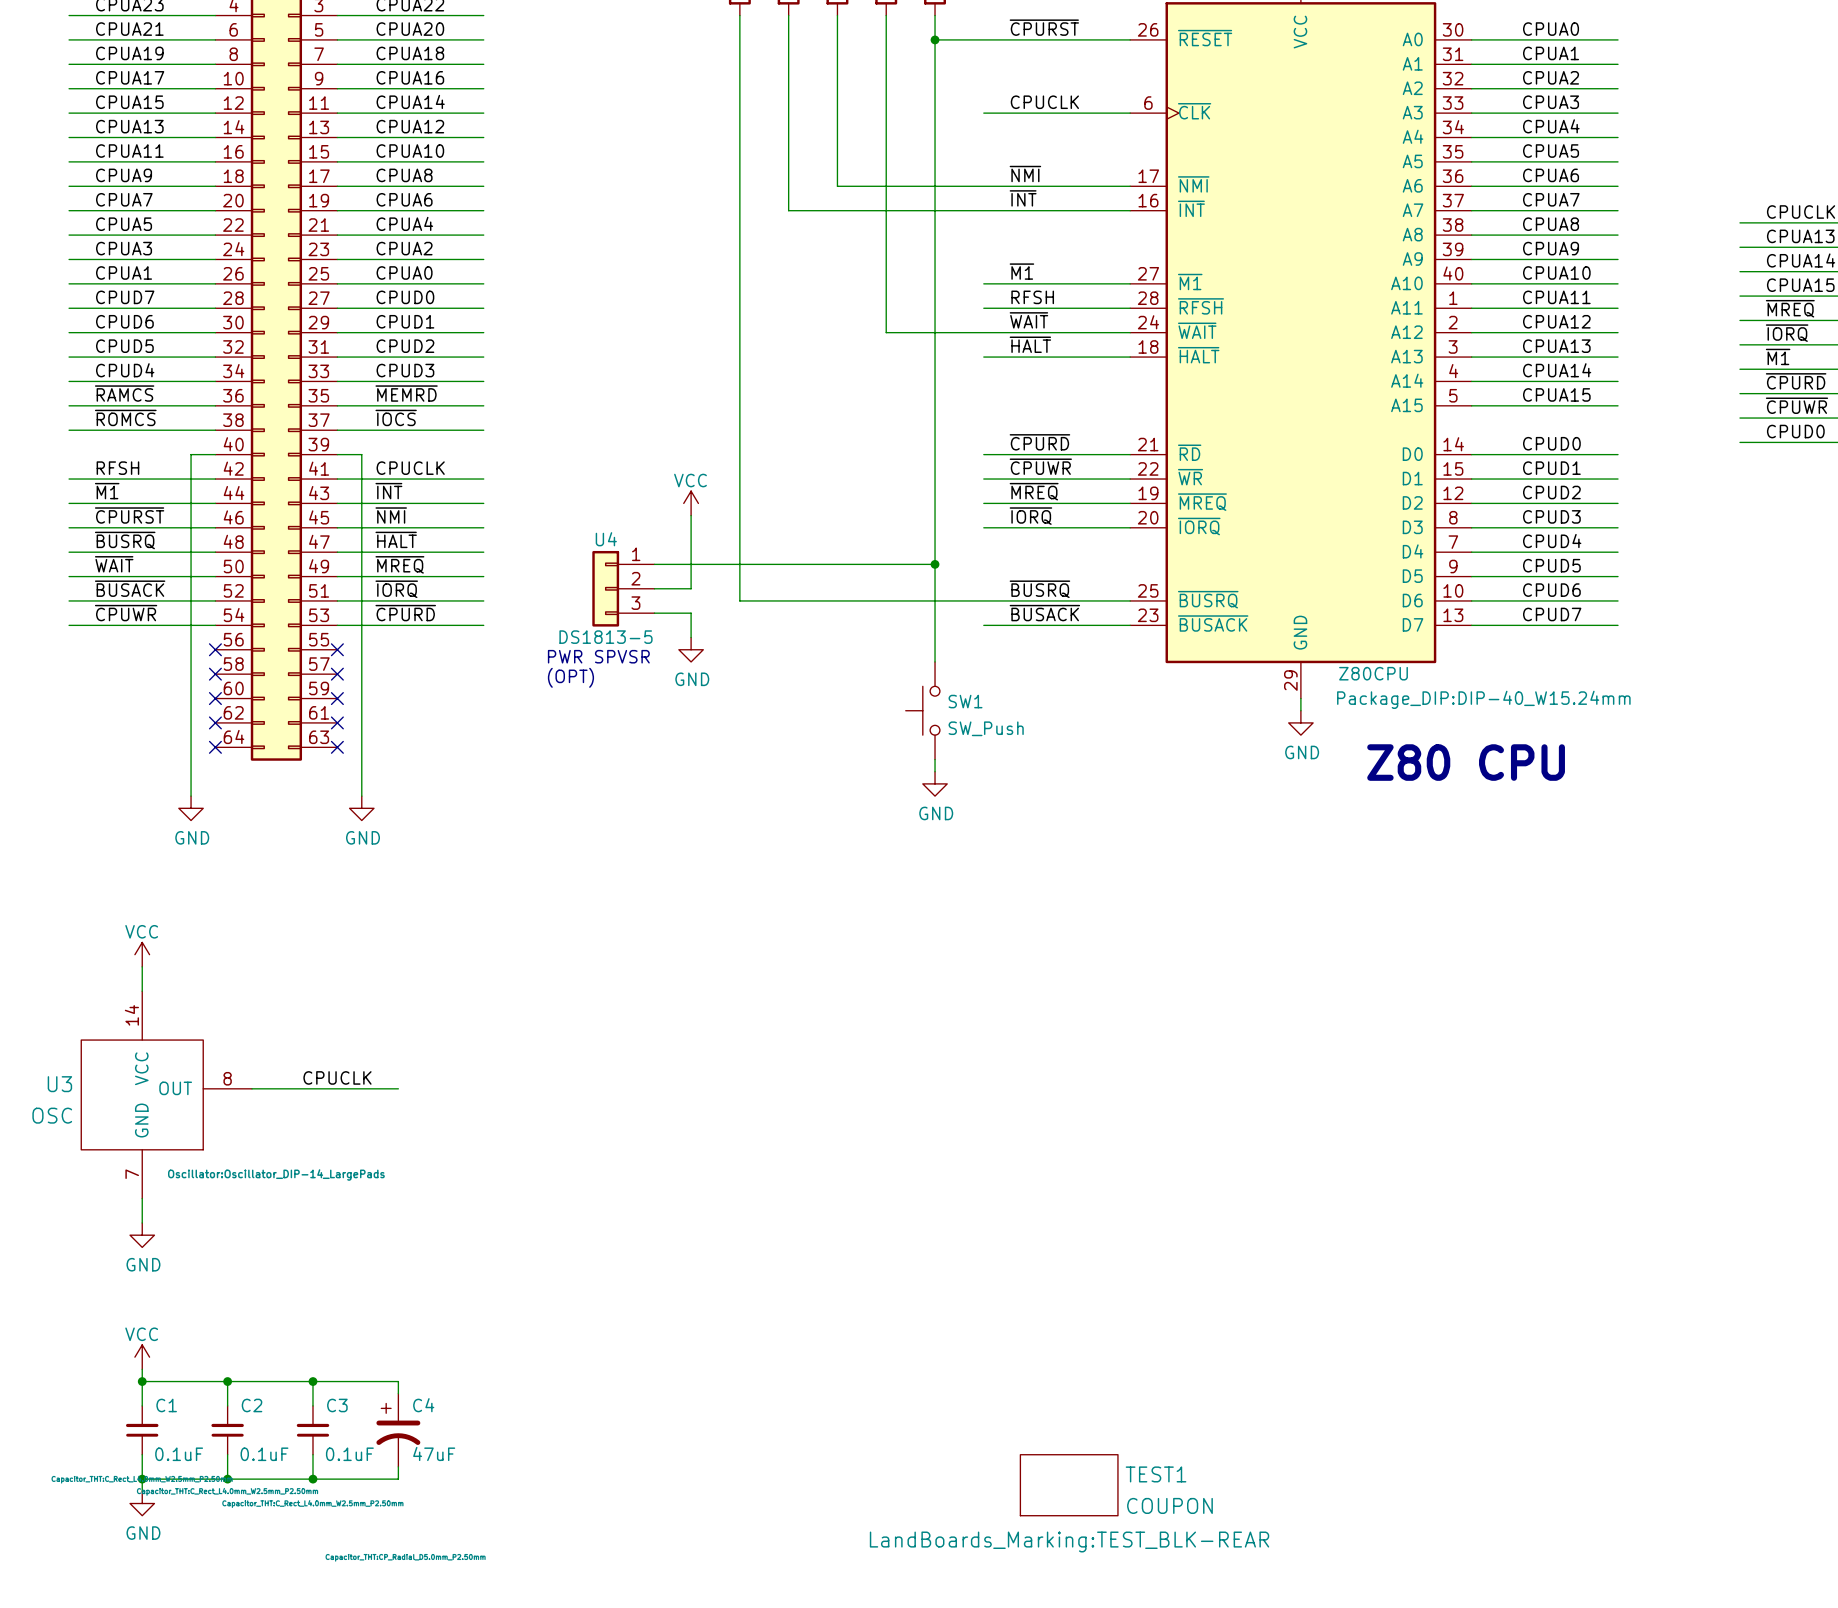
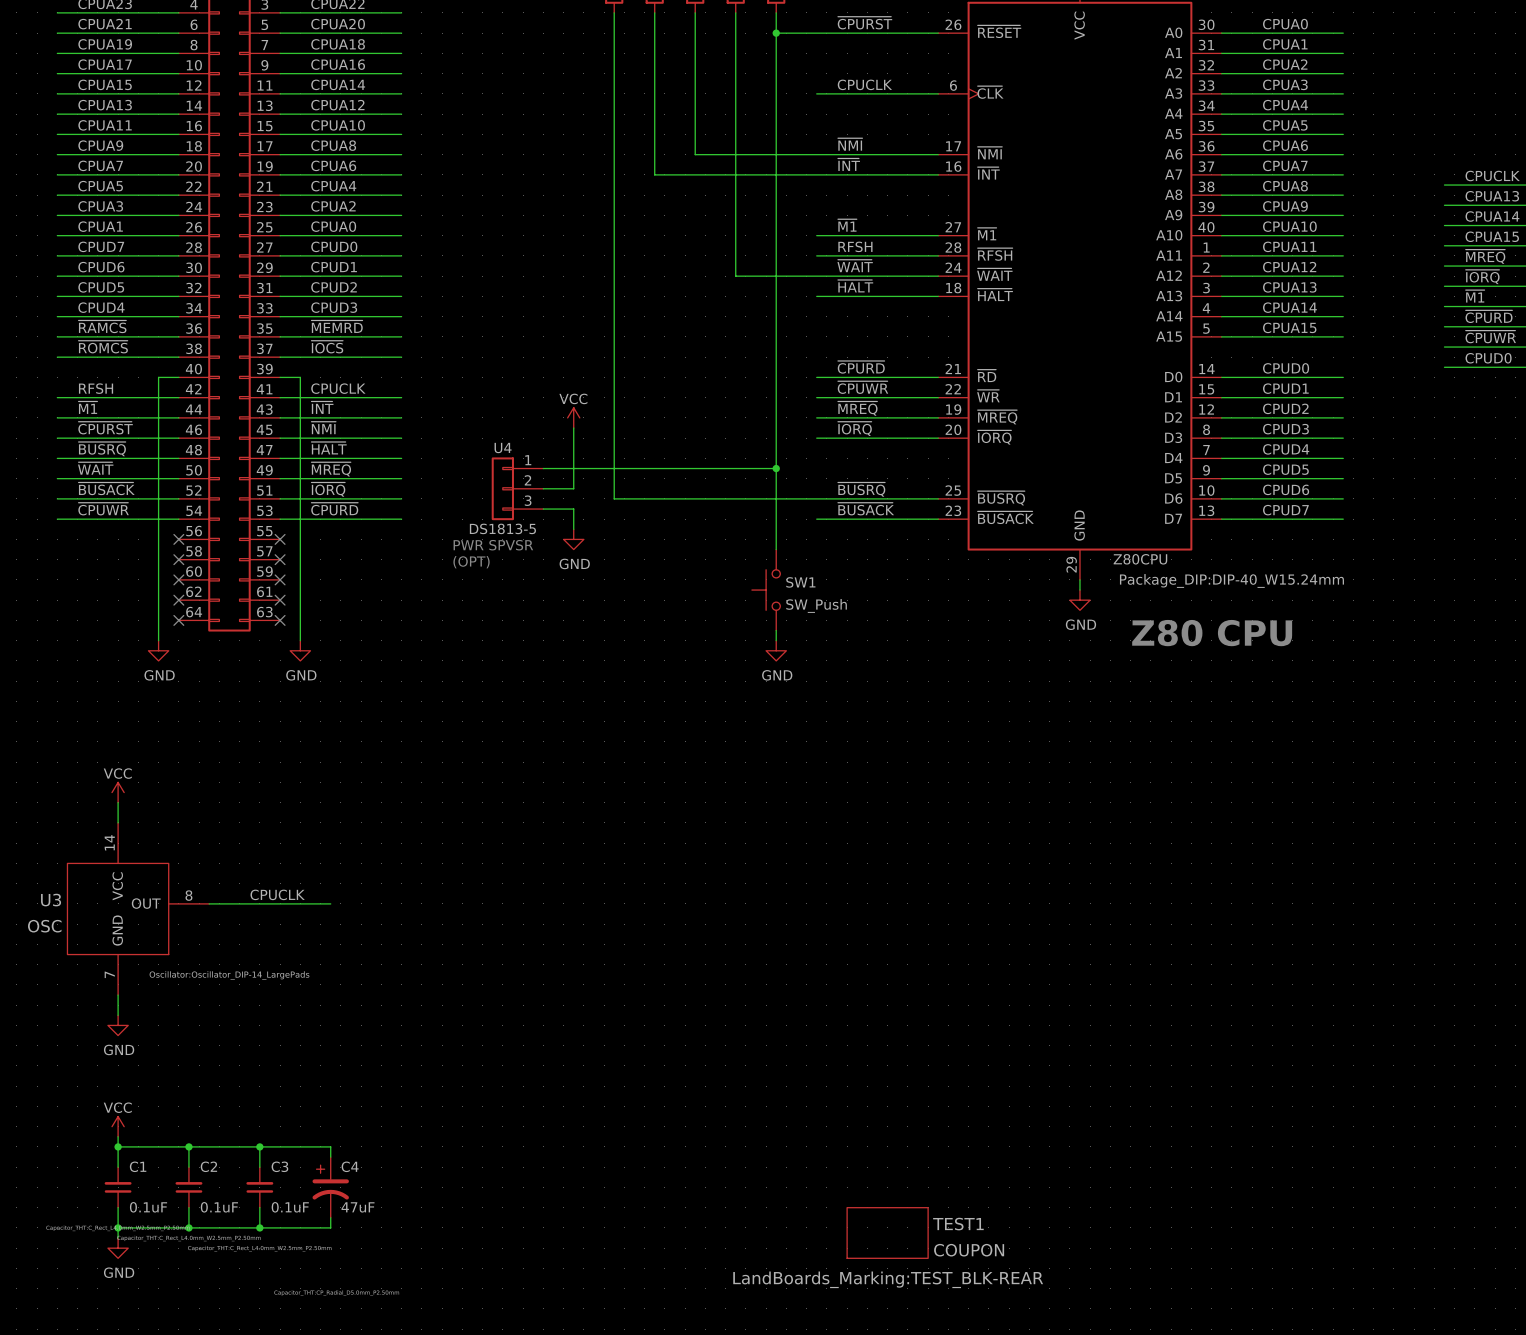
power symbol position: GND (191, 808) -> GND (158, 650)
power symbol position: GND (361, 808) -> GND (300, 650)

